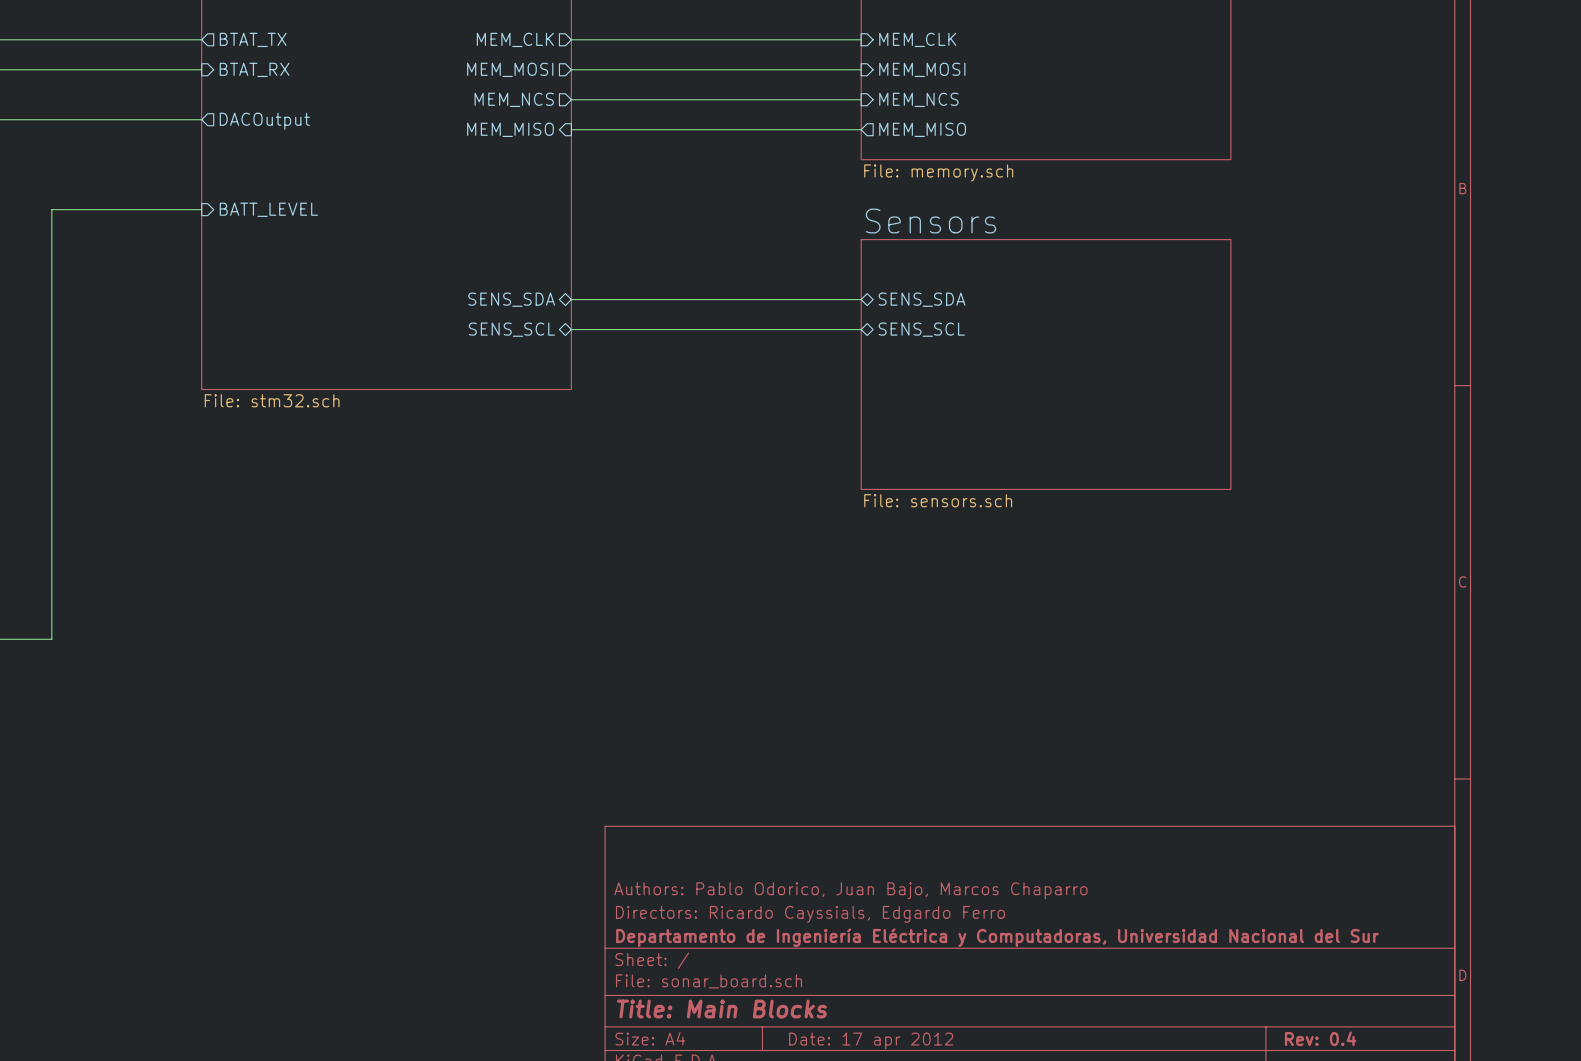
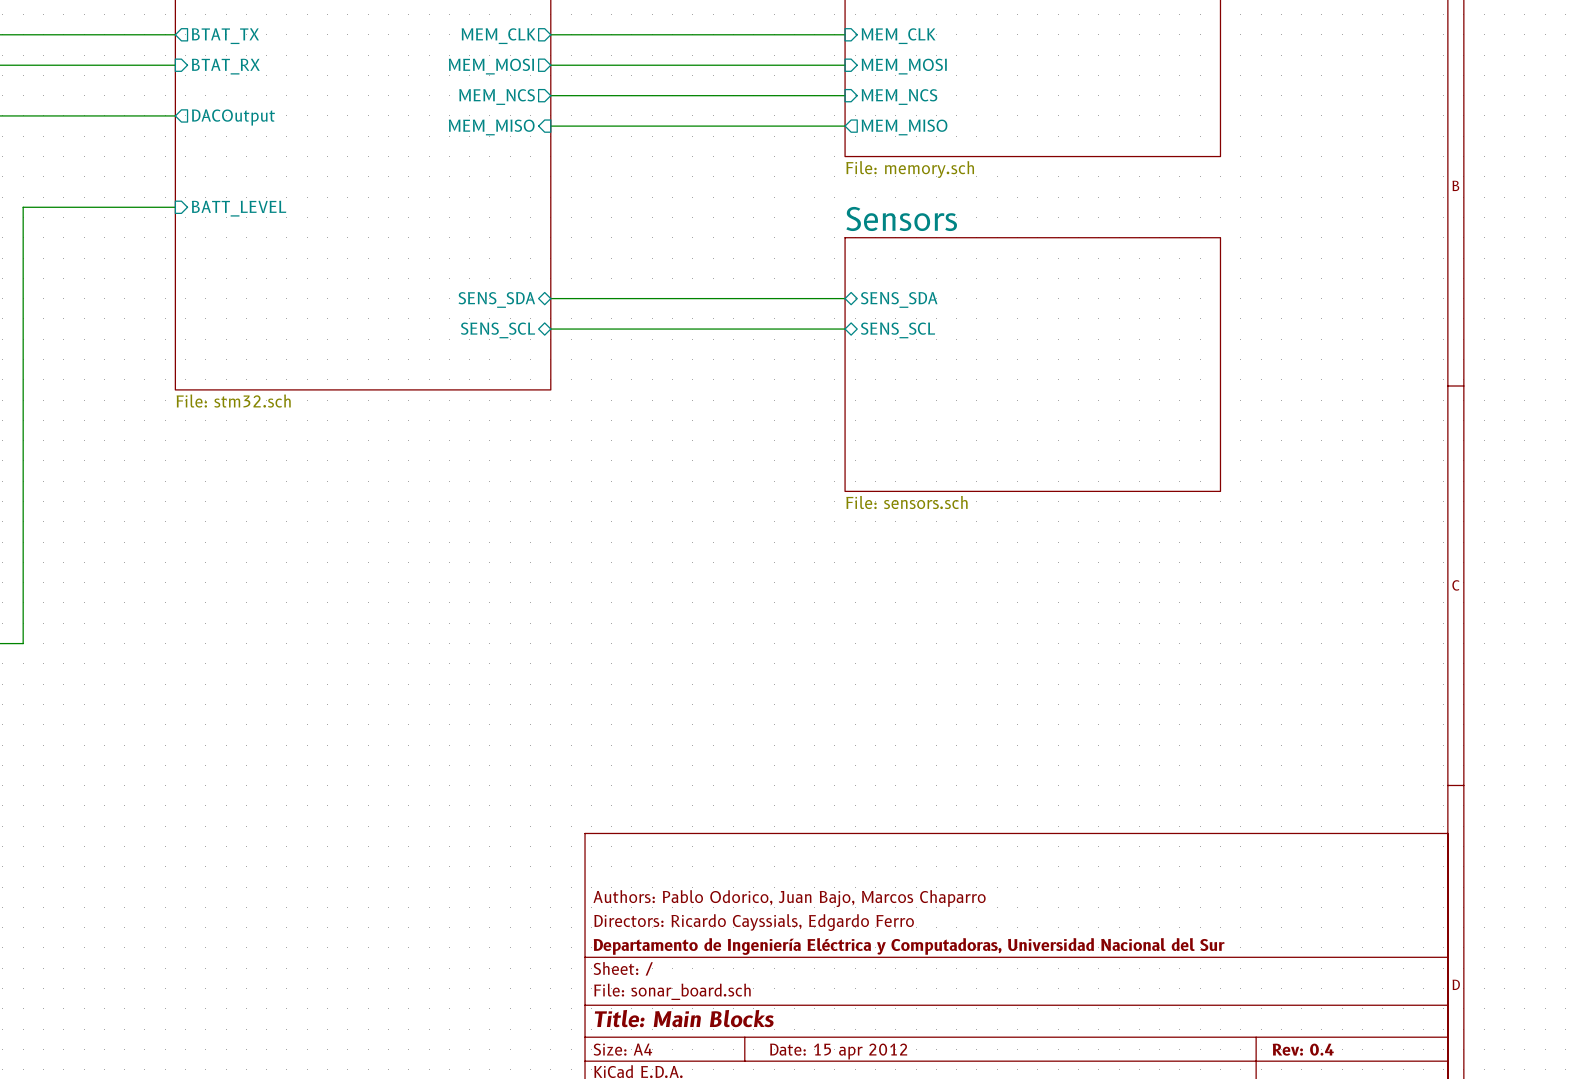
title block: Date: 17 apr 2012 (871, 1041) -> Date: 15 apr 2012 (838, 1051)

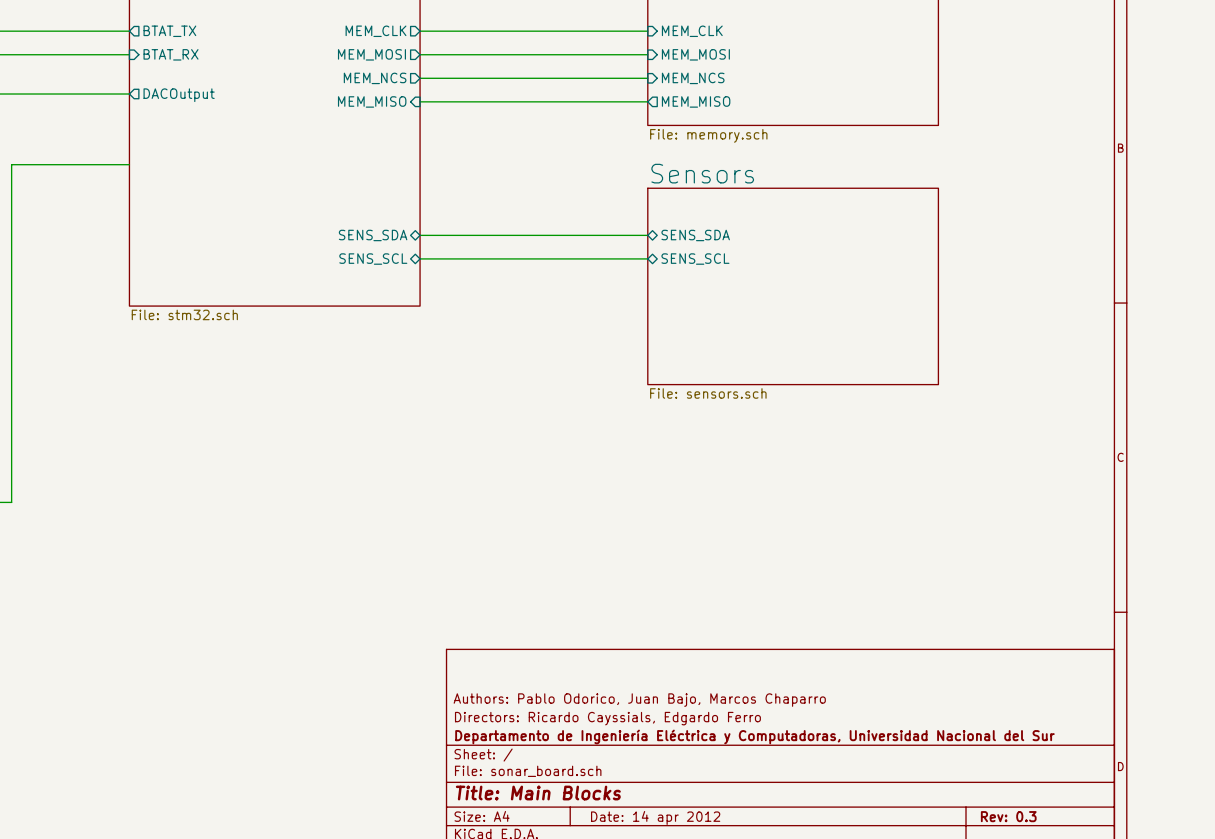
sheet pin: BATT_LEVEL (239, 208) -> none
title block: Rev: 0.4 (1303, 1049) -> Rev: 0.3 (1008, 816)
title block: Date: 15 apr 2012 (838, 1051) -> Date: 14 apr 2012 (655, 817)

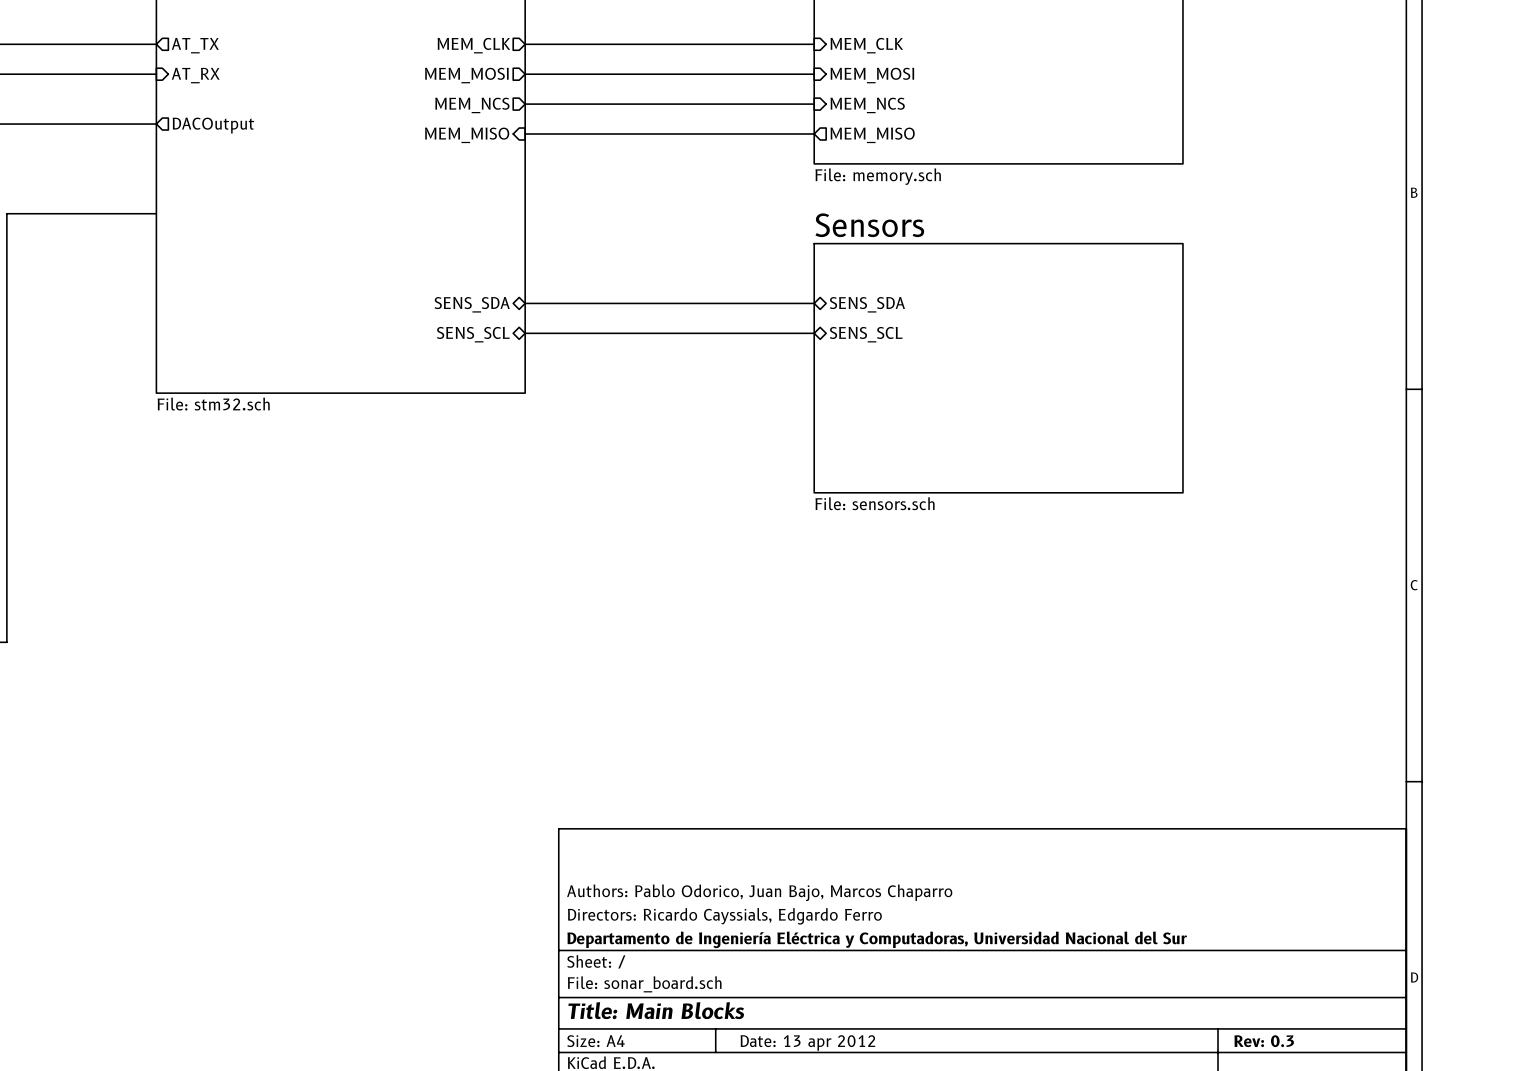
sheet pin: BTAT_TX (169, 31) -> AT_TX (195, 45)
sheet pin: BTAT_RX (171, 54) -> AT_RX (195, 75)
title block: Date: 14 apr 2012 (655, 817) -> Date: 13 apr 2012 (807, 1043)

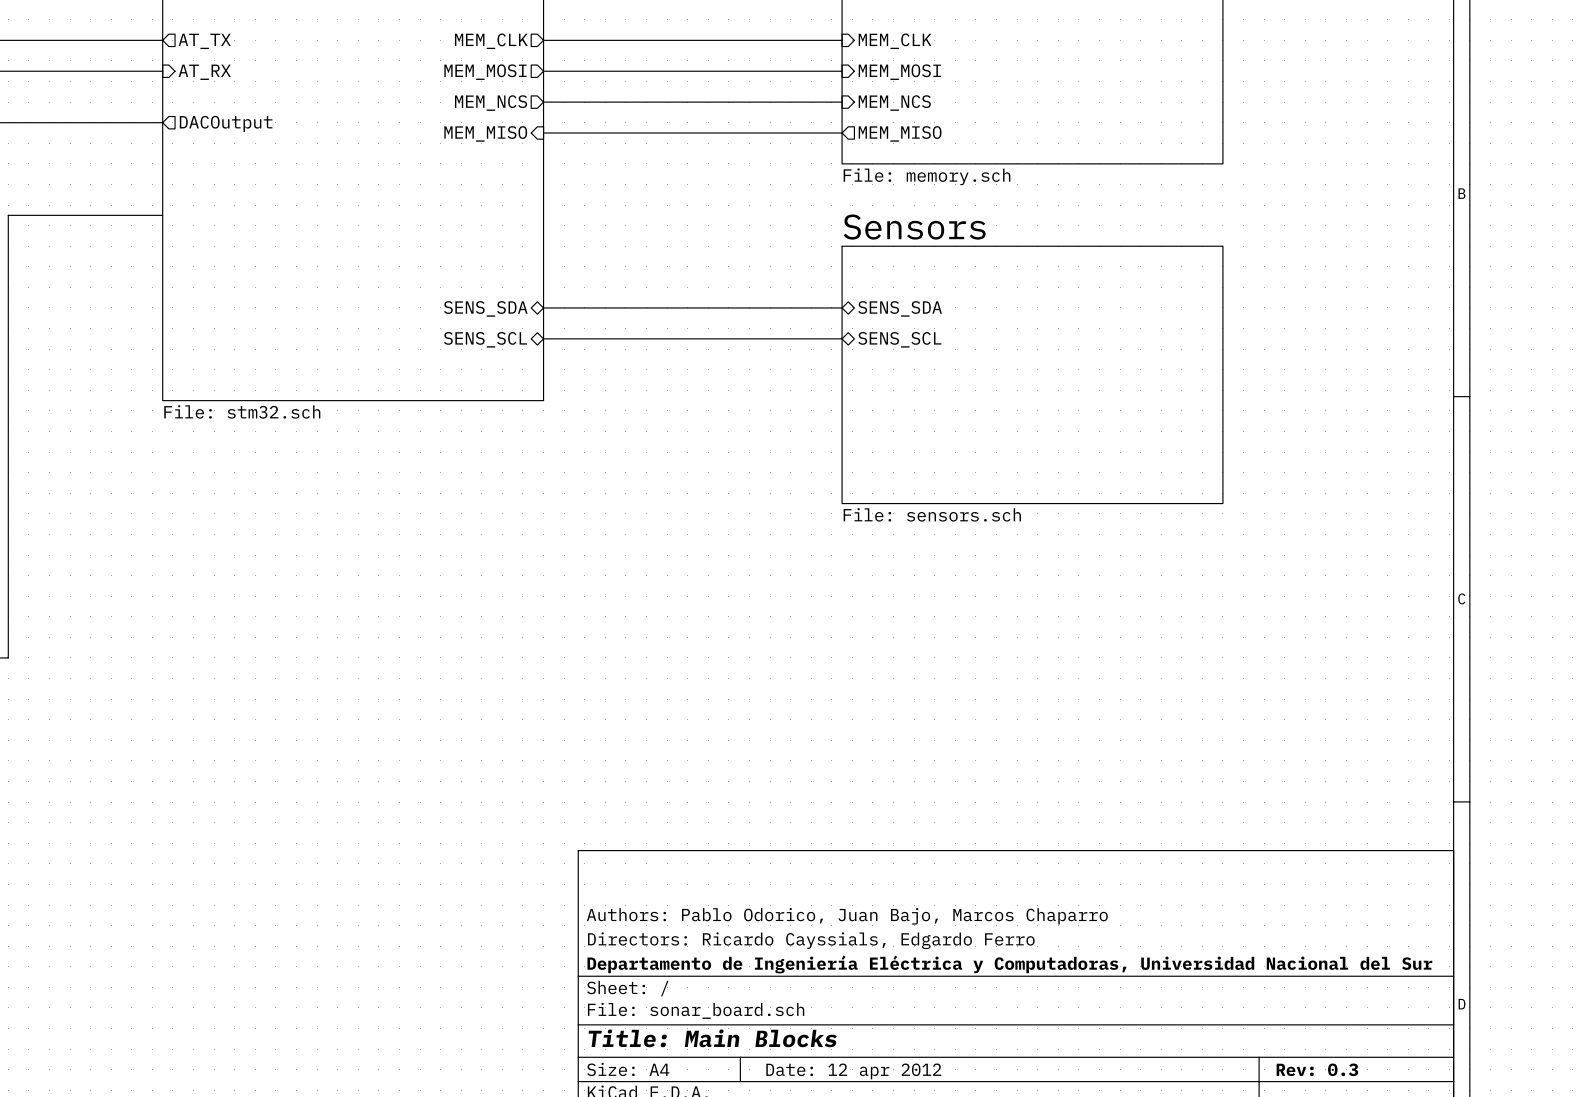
title block: Date: 13 apr 2012 (807, 1043) -> Date: 12 apr 2012 (853, 1071)

